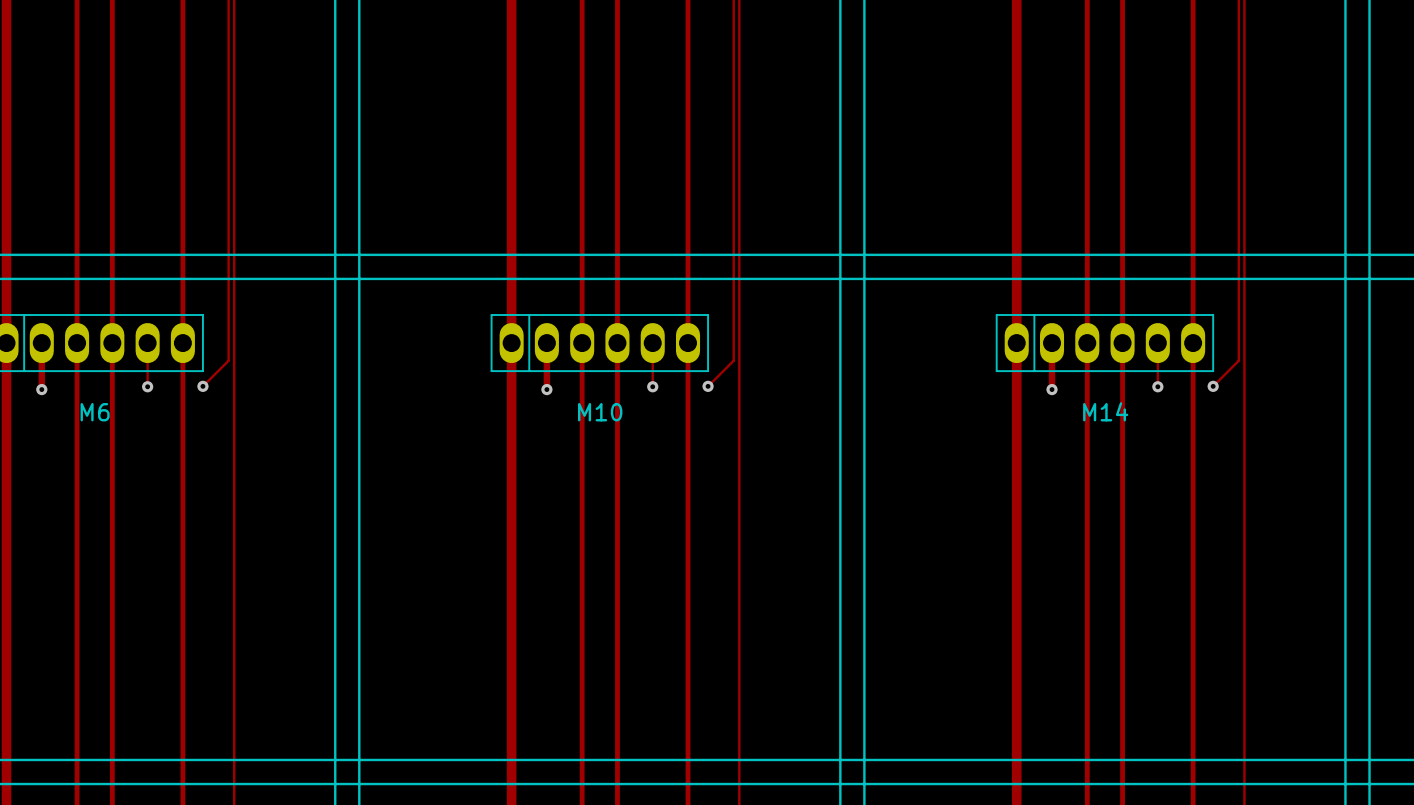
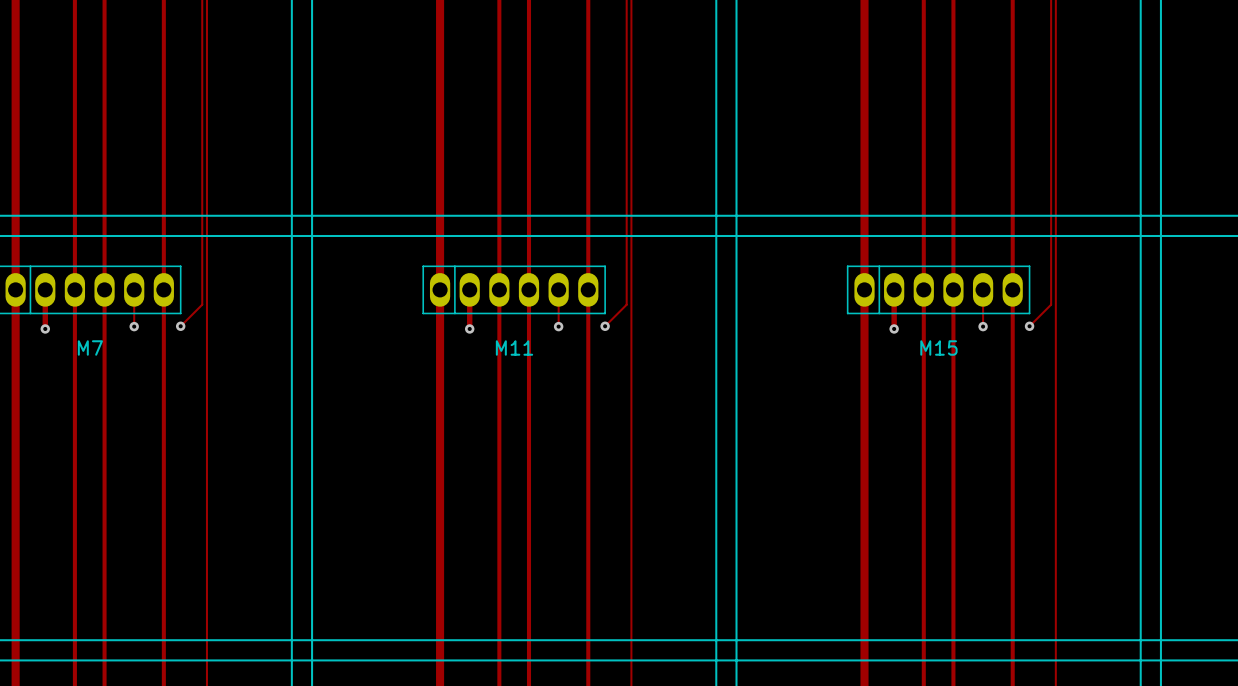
M14 name: M14 (1105, 411) -> M15 (938, 348)
M6 name: M6 (95, 412) -> M7 (90, 348)
M10 name: M10 (600, 412) -> M11 (514, 348)

